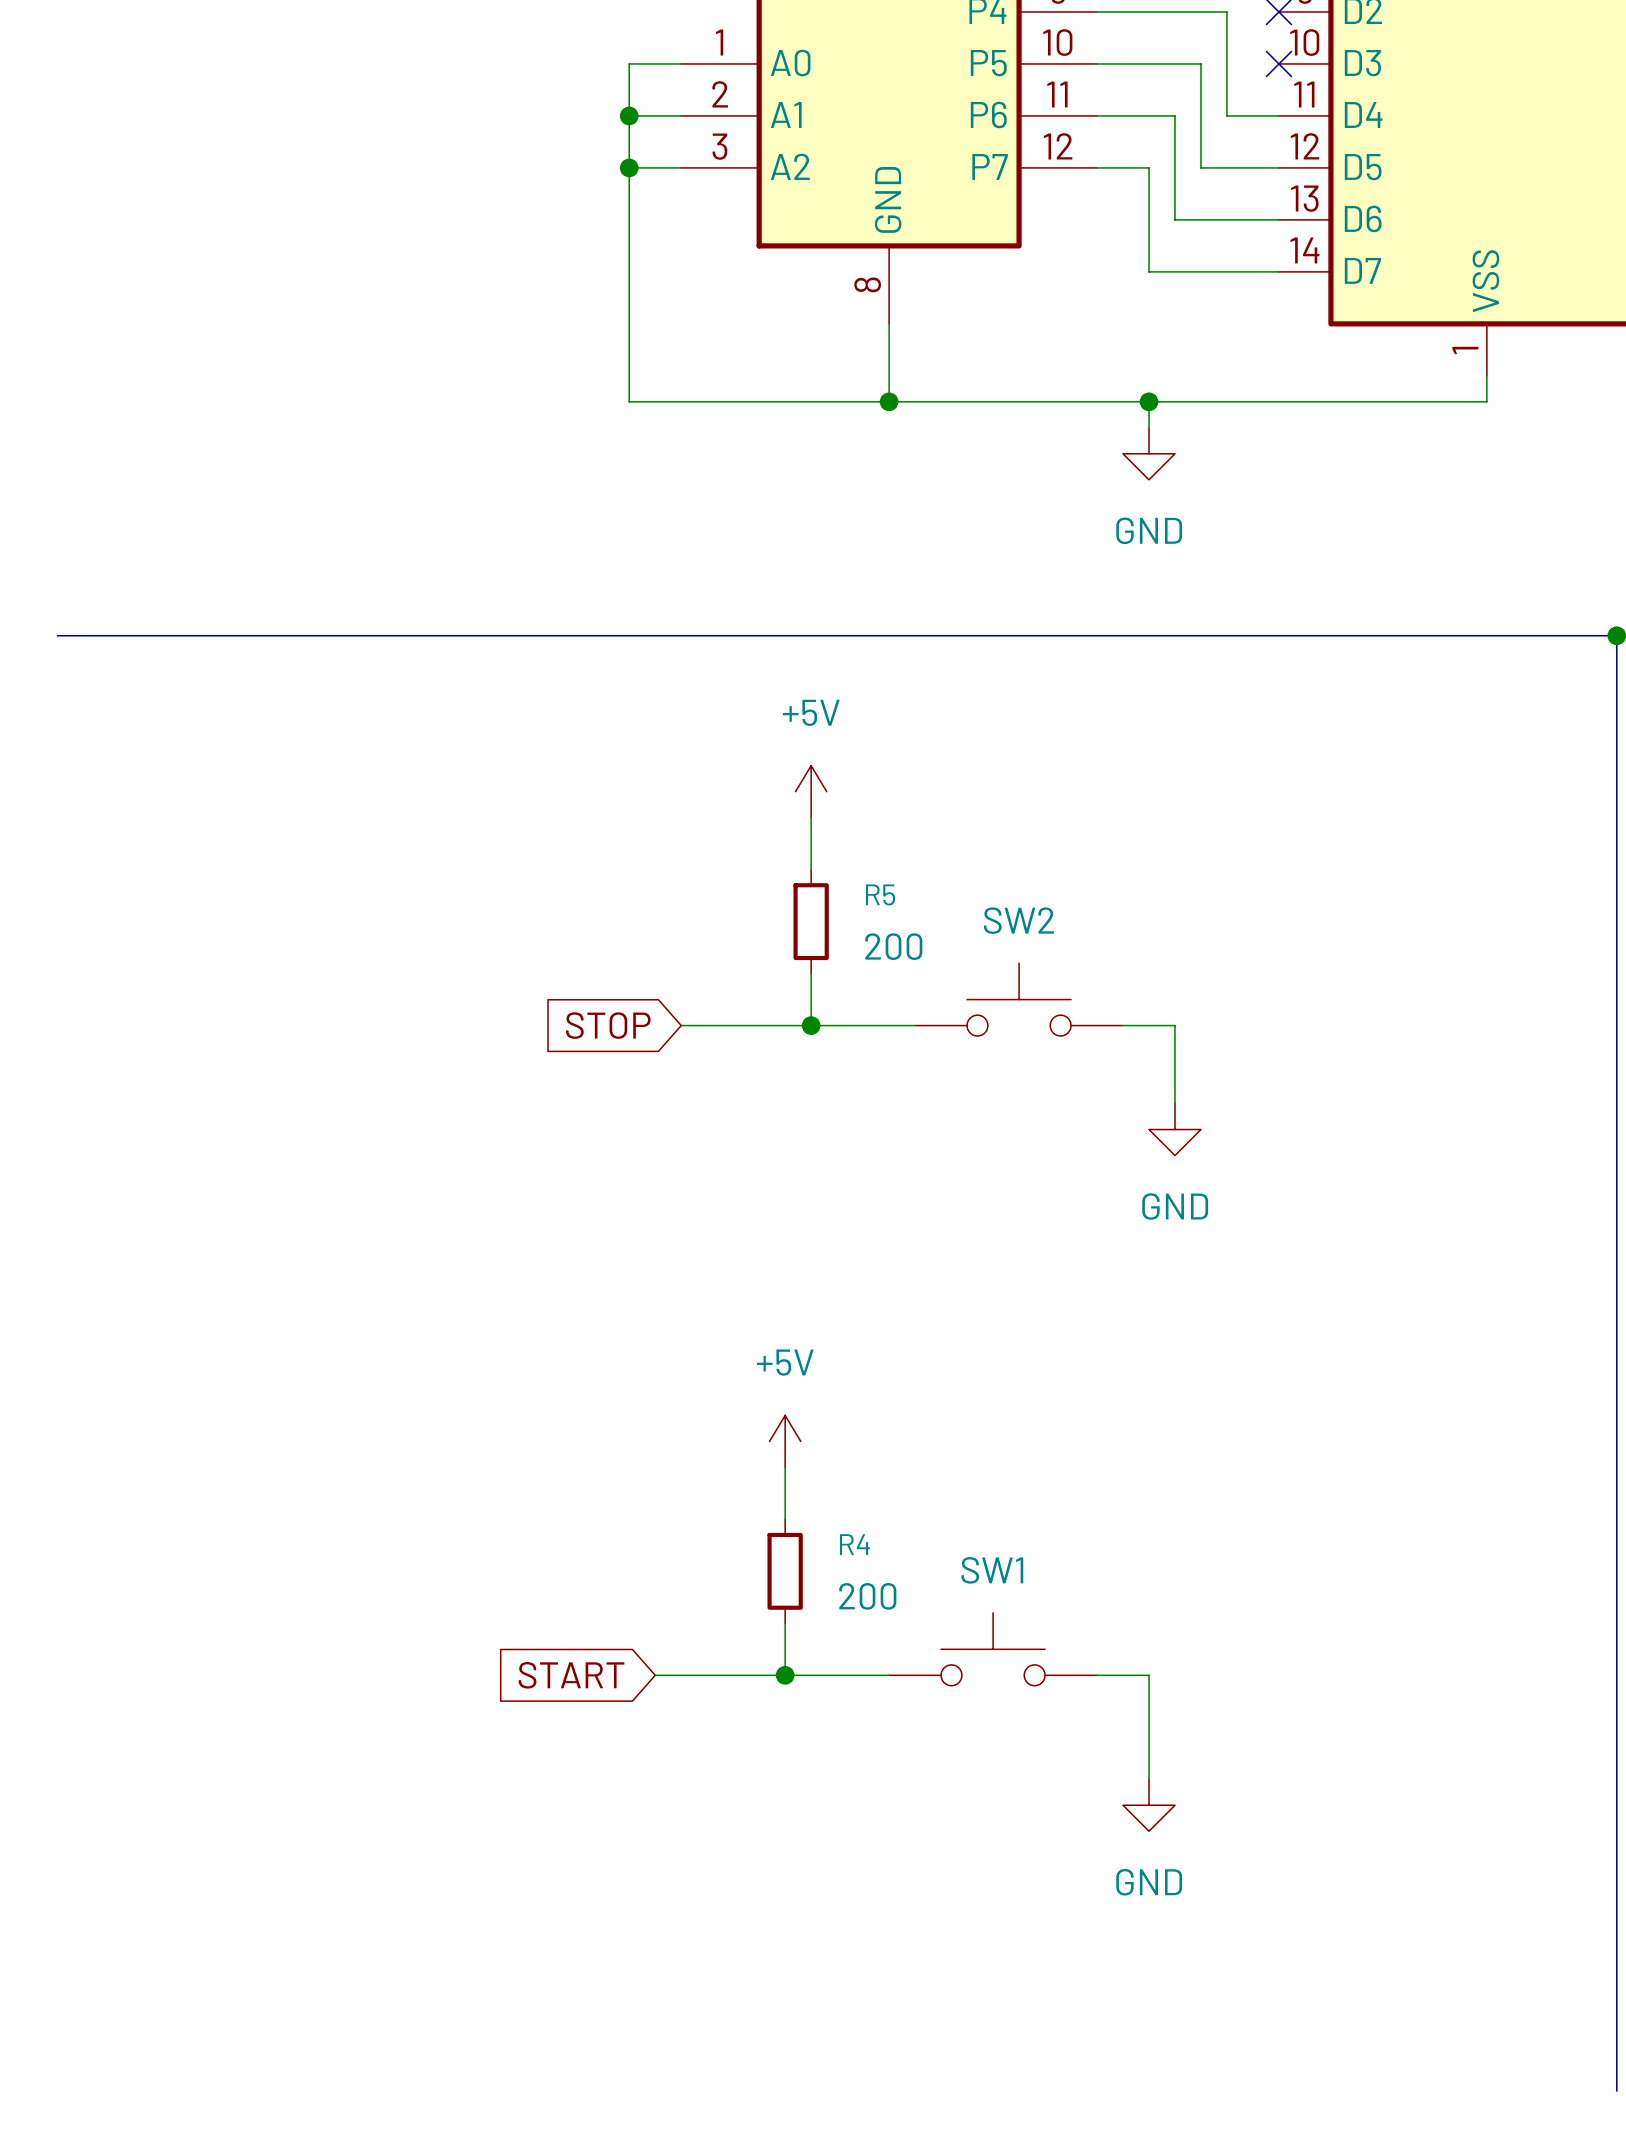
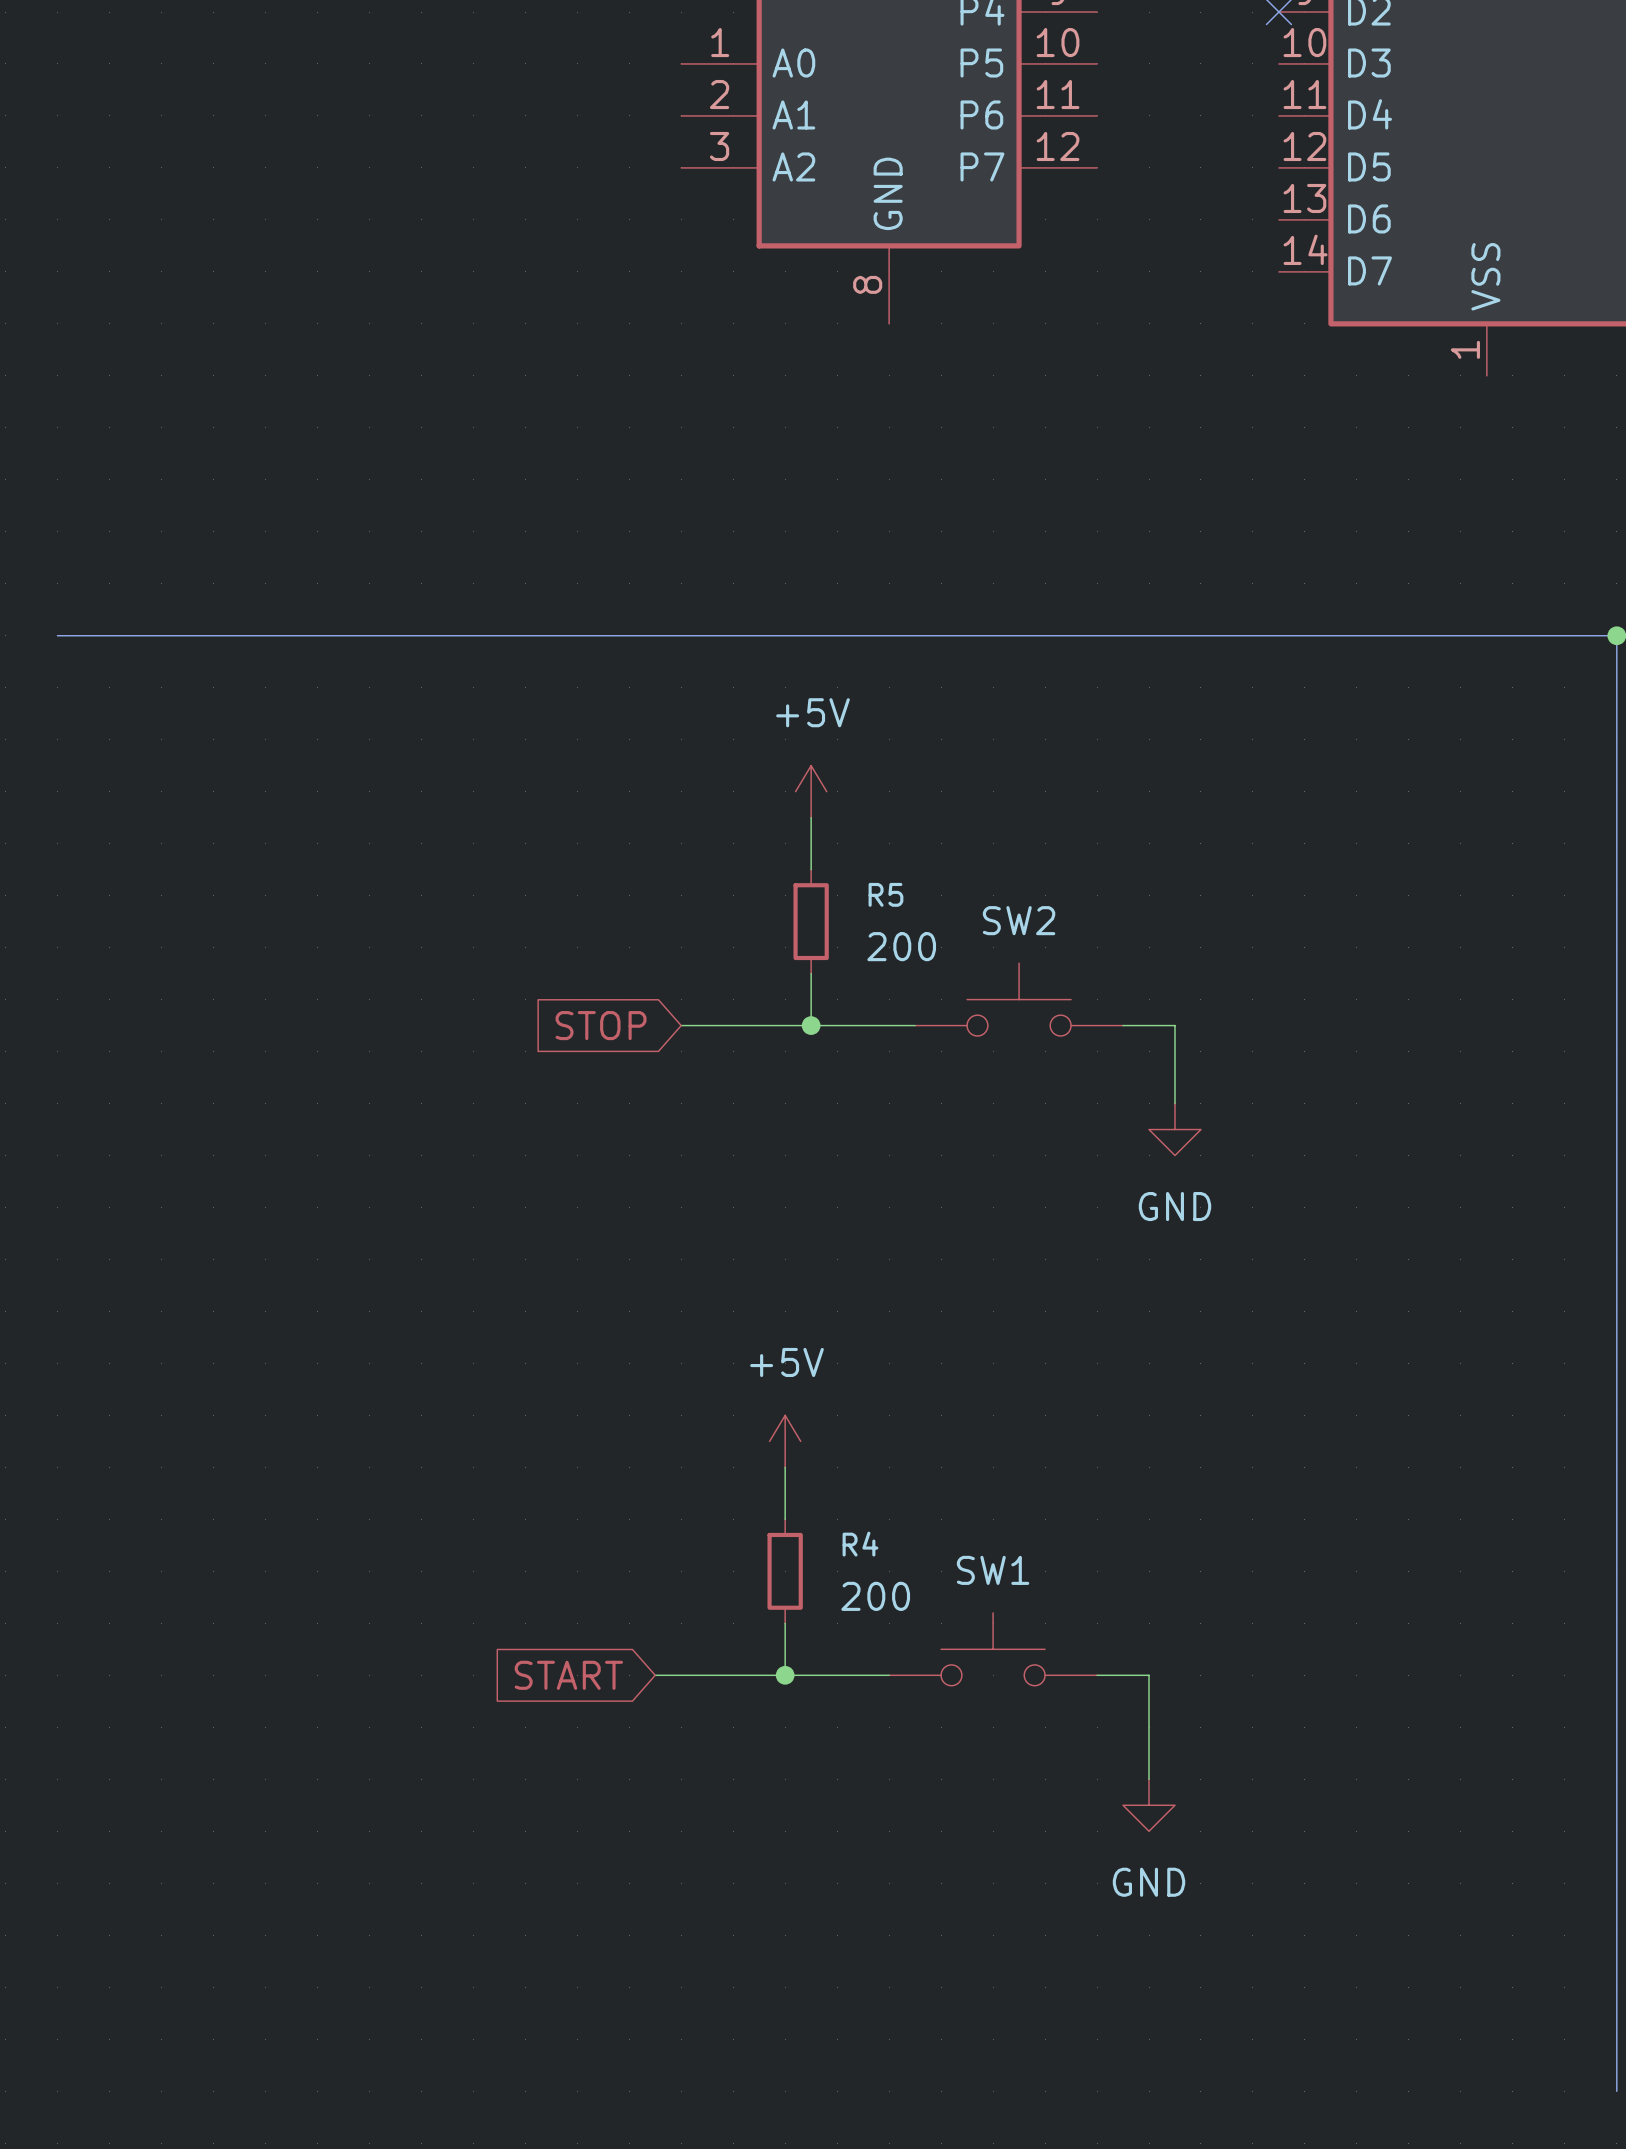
wire: (1097, 12) (1226, 12) (1226, 115) (1278, 115) -> none
wire: (681, 63) (629, 63) (629, 401) (1486, 401) (1486, 375) -> none
wire: (1097, 63) (1200, 63) (1200, 167) (1278, 167) -> none
no-connect mark: (1278, 63) -> none
wire: (629, 115) (681, 115) -> none
junction: (629, 115) -> none
wire: (1097, 115) (1174, 115) (1174, 219) (1278, 219) -> none
wire: (629, 167) (681, 167) -> none
junction: (629, 167) -> none
wire: (1097, 167) (1149, 167) (1149, 271) (1278, 271) -> none
wire: (889, 323) (889, 401) -> none
junction: (889, 401) -> none
wire: (1149, 401) (1149, 427) -> none
junction: (1149, 401) -> none
power symbol: GND (1149, 453) -> none

